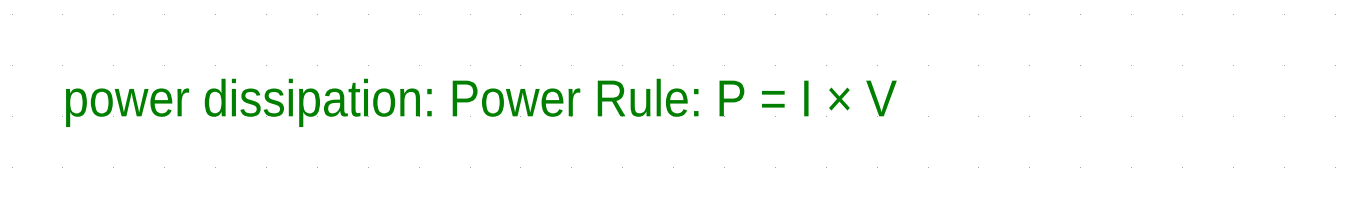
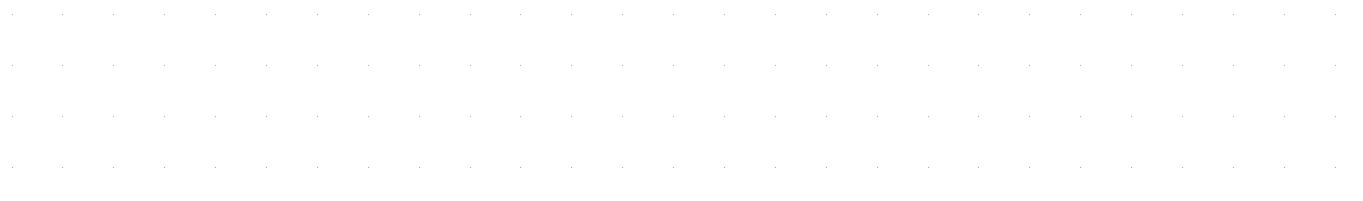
text: power dissipation: Power Rule: P = I × V (481, 102) -> none

